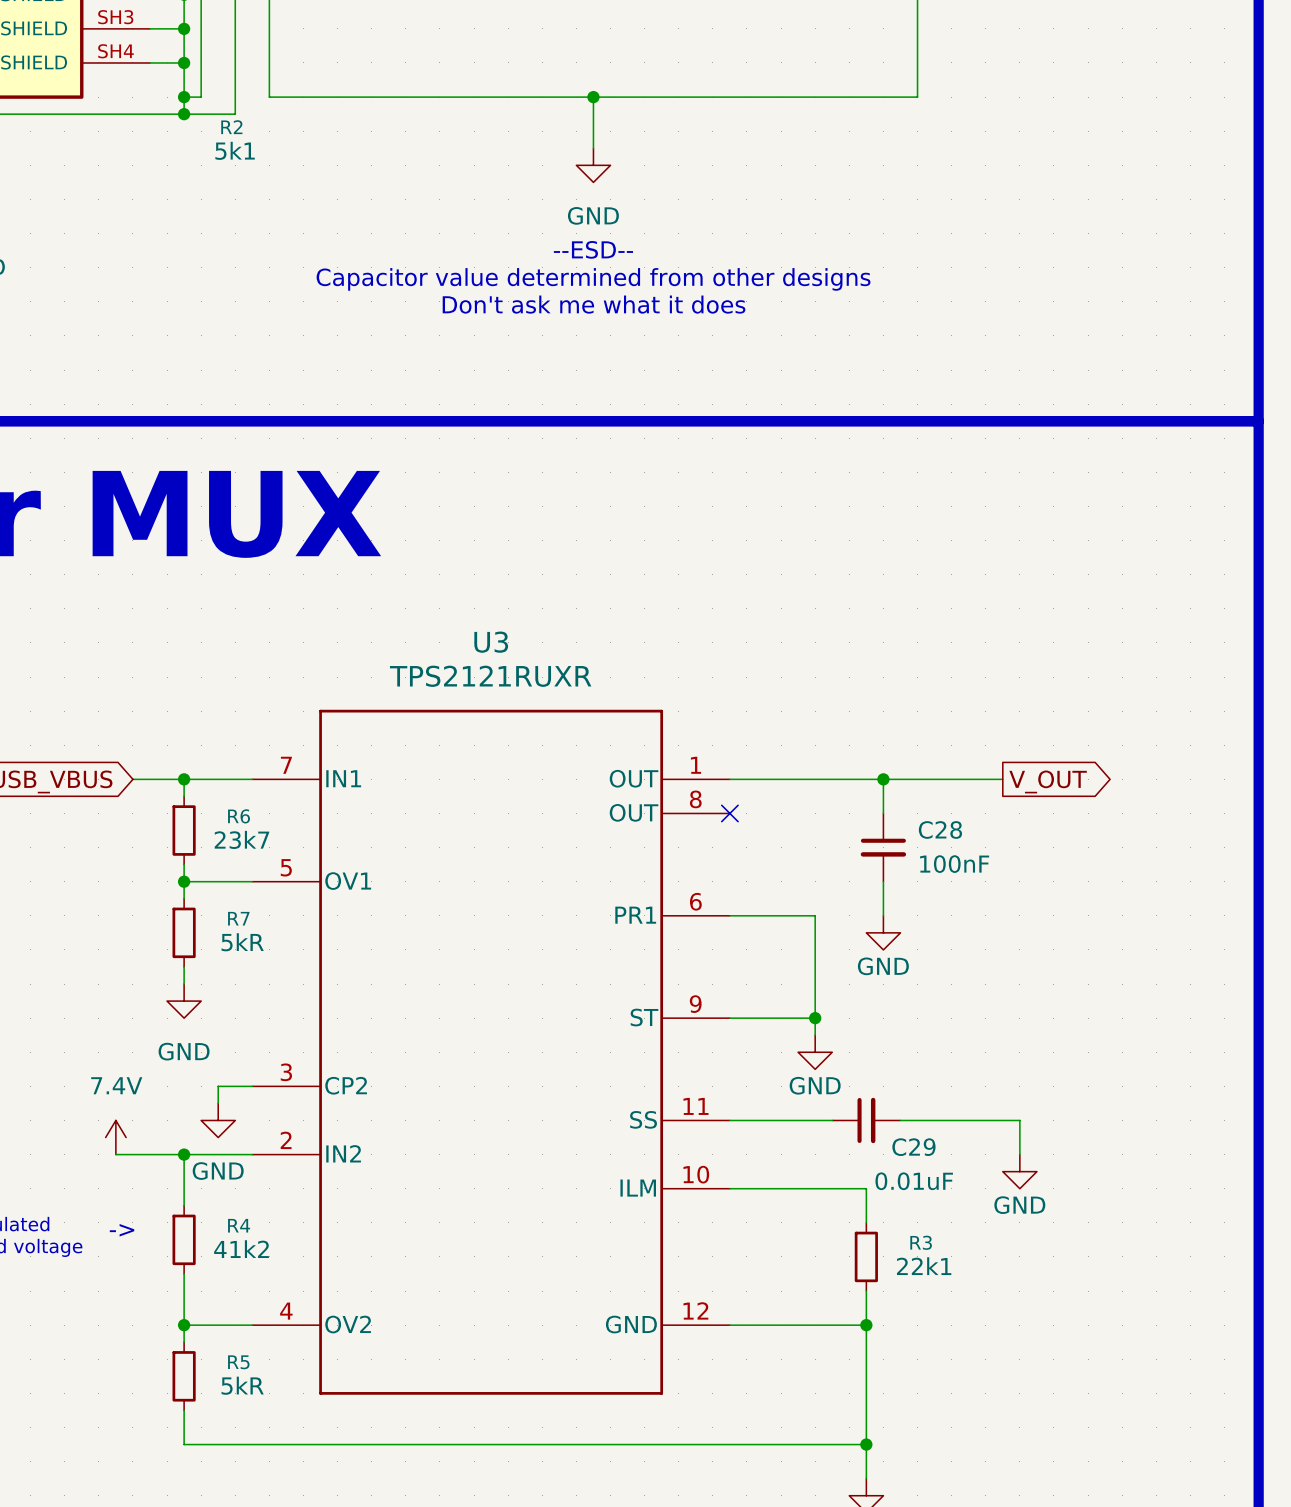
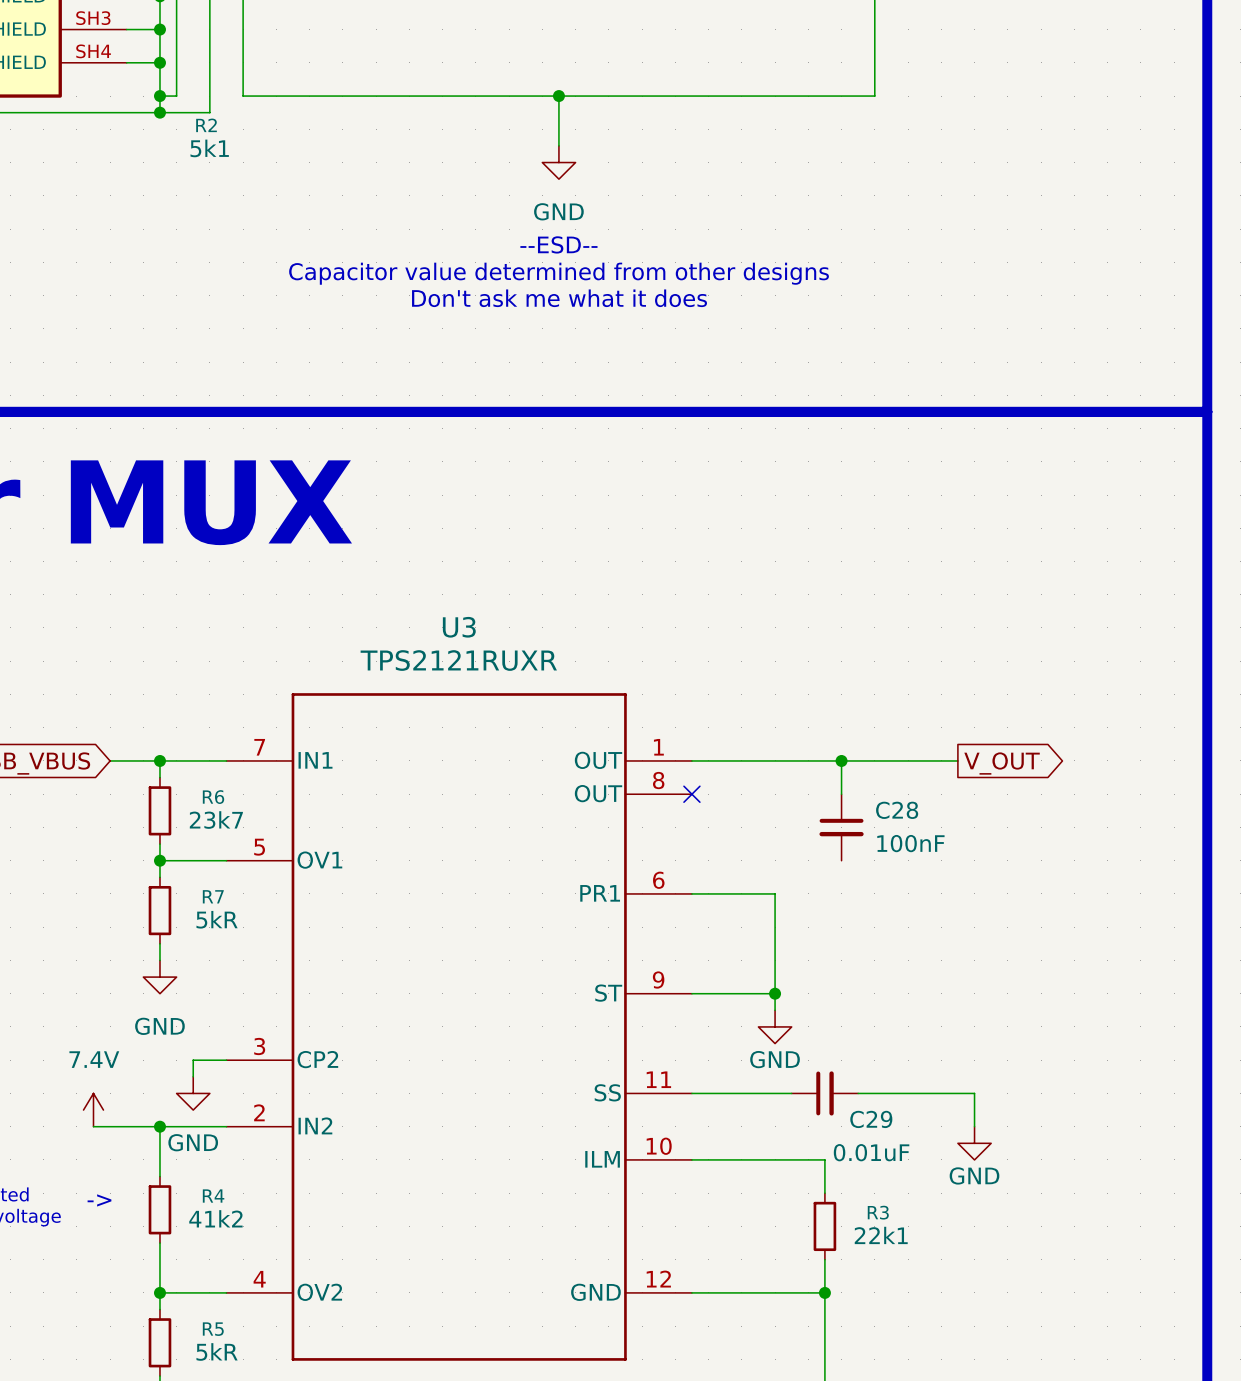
wire: (883, 881) (883, 915) -> none
power symbol: GND (883, 932) -> none

